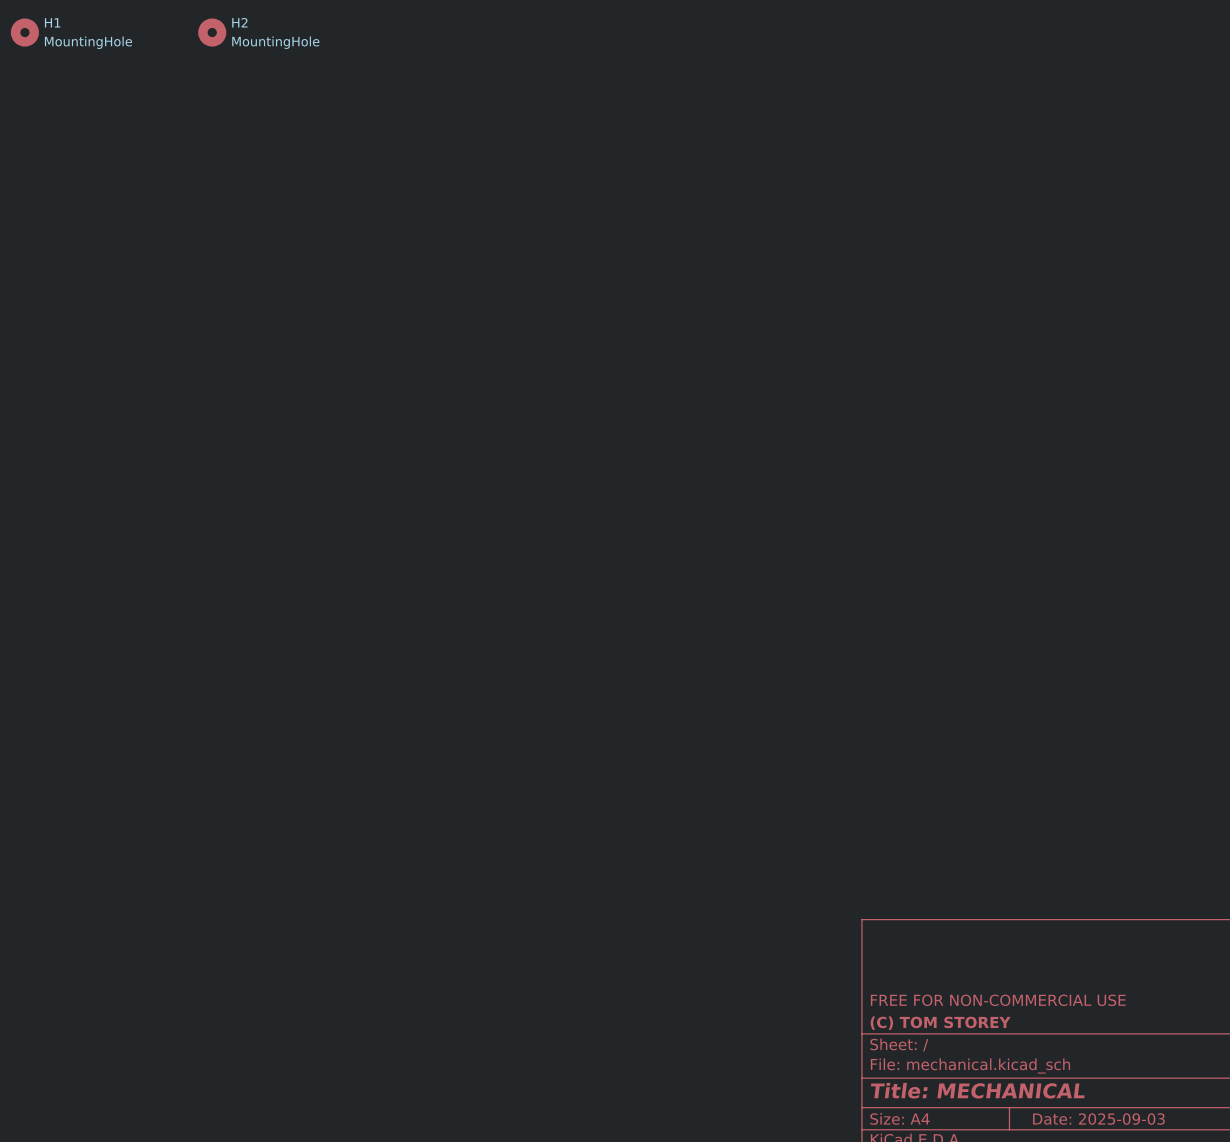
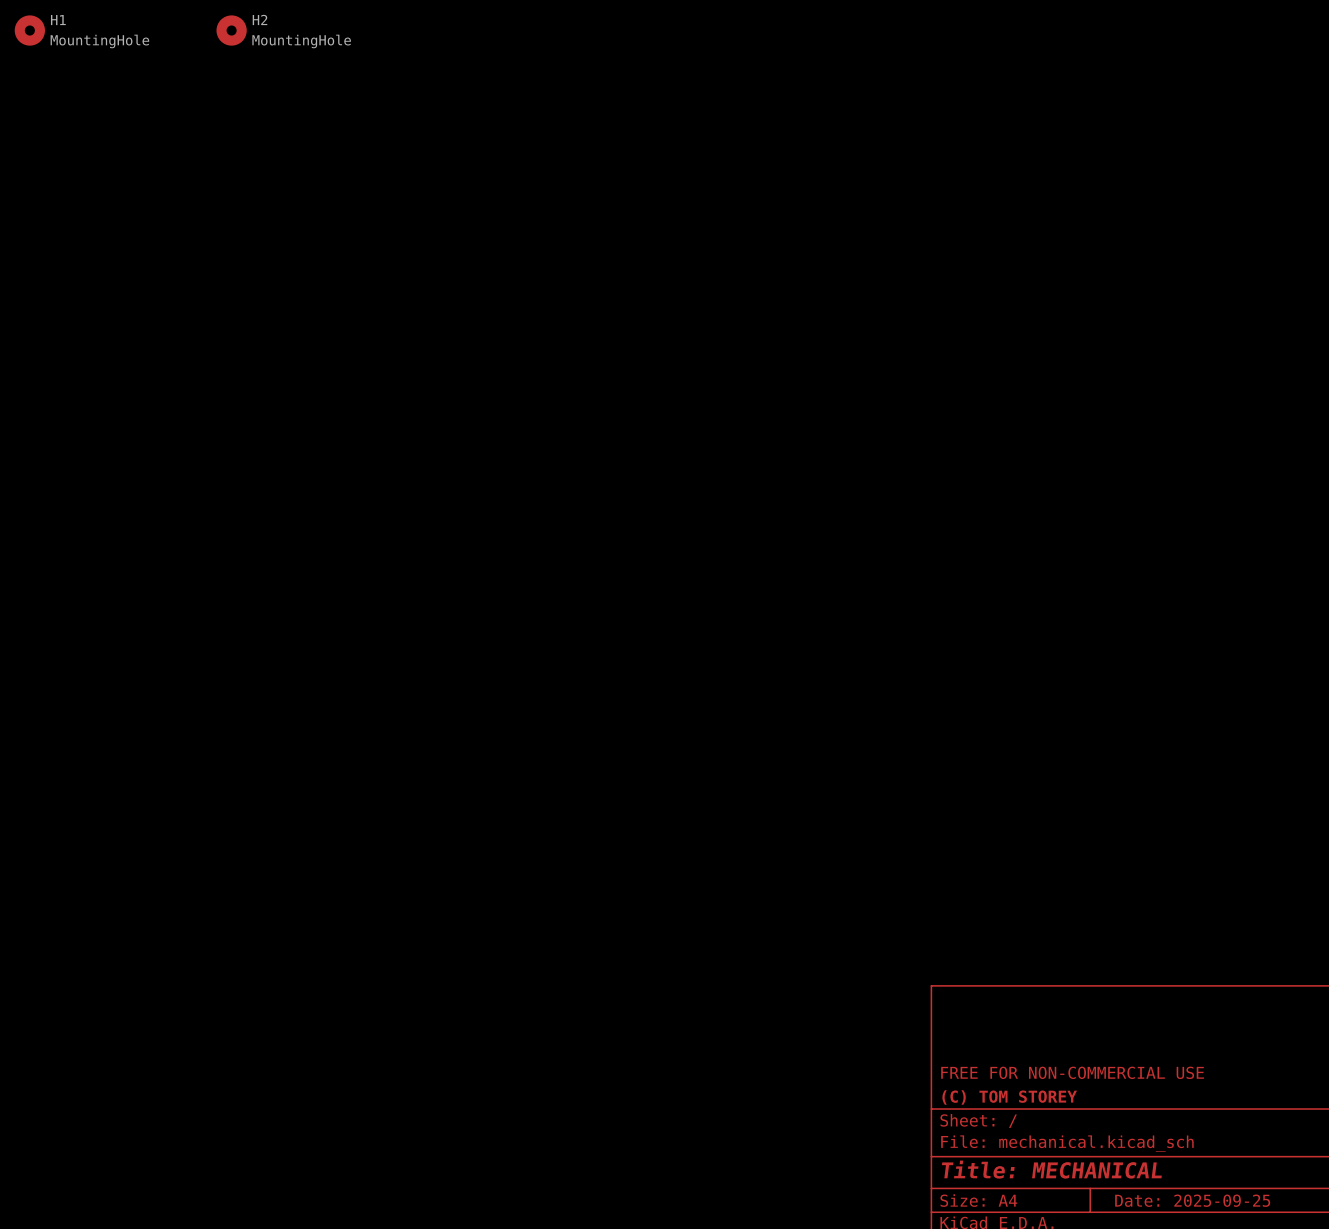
title block: Date: 2025-09-03 (1098, 1119) -> Date: 2025-09-25 (1192, 1200)

